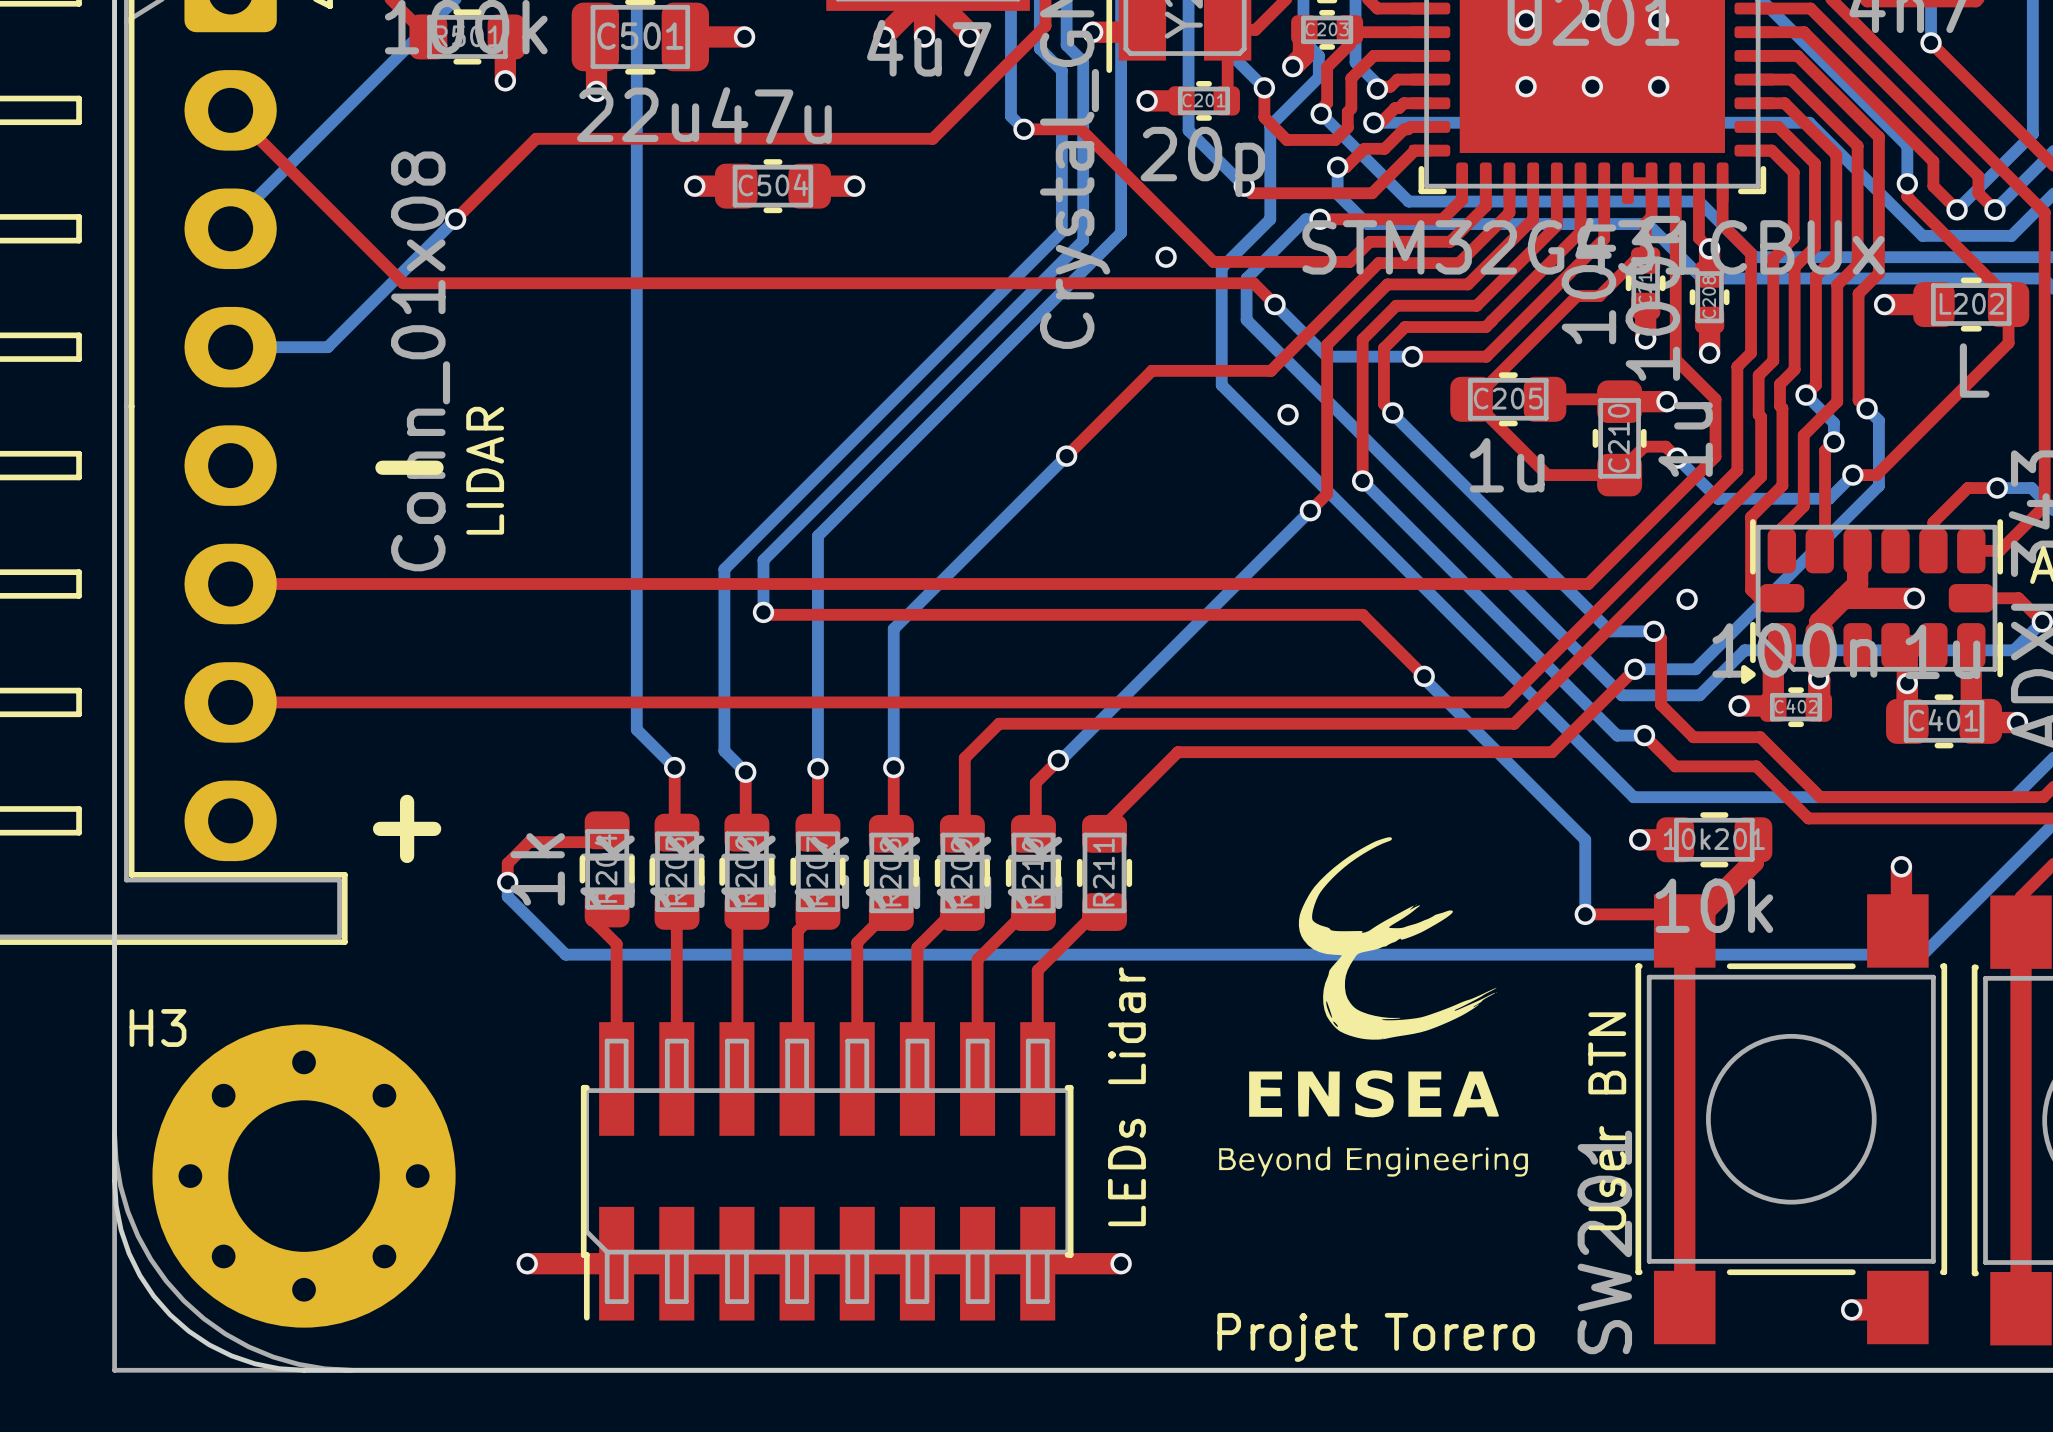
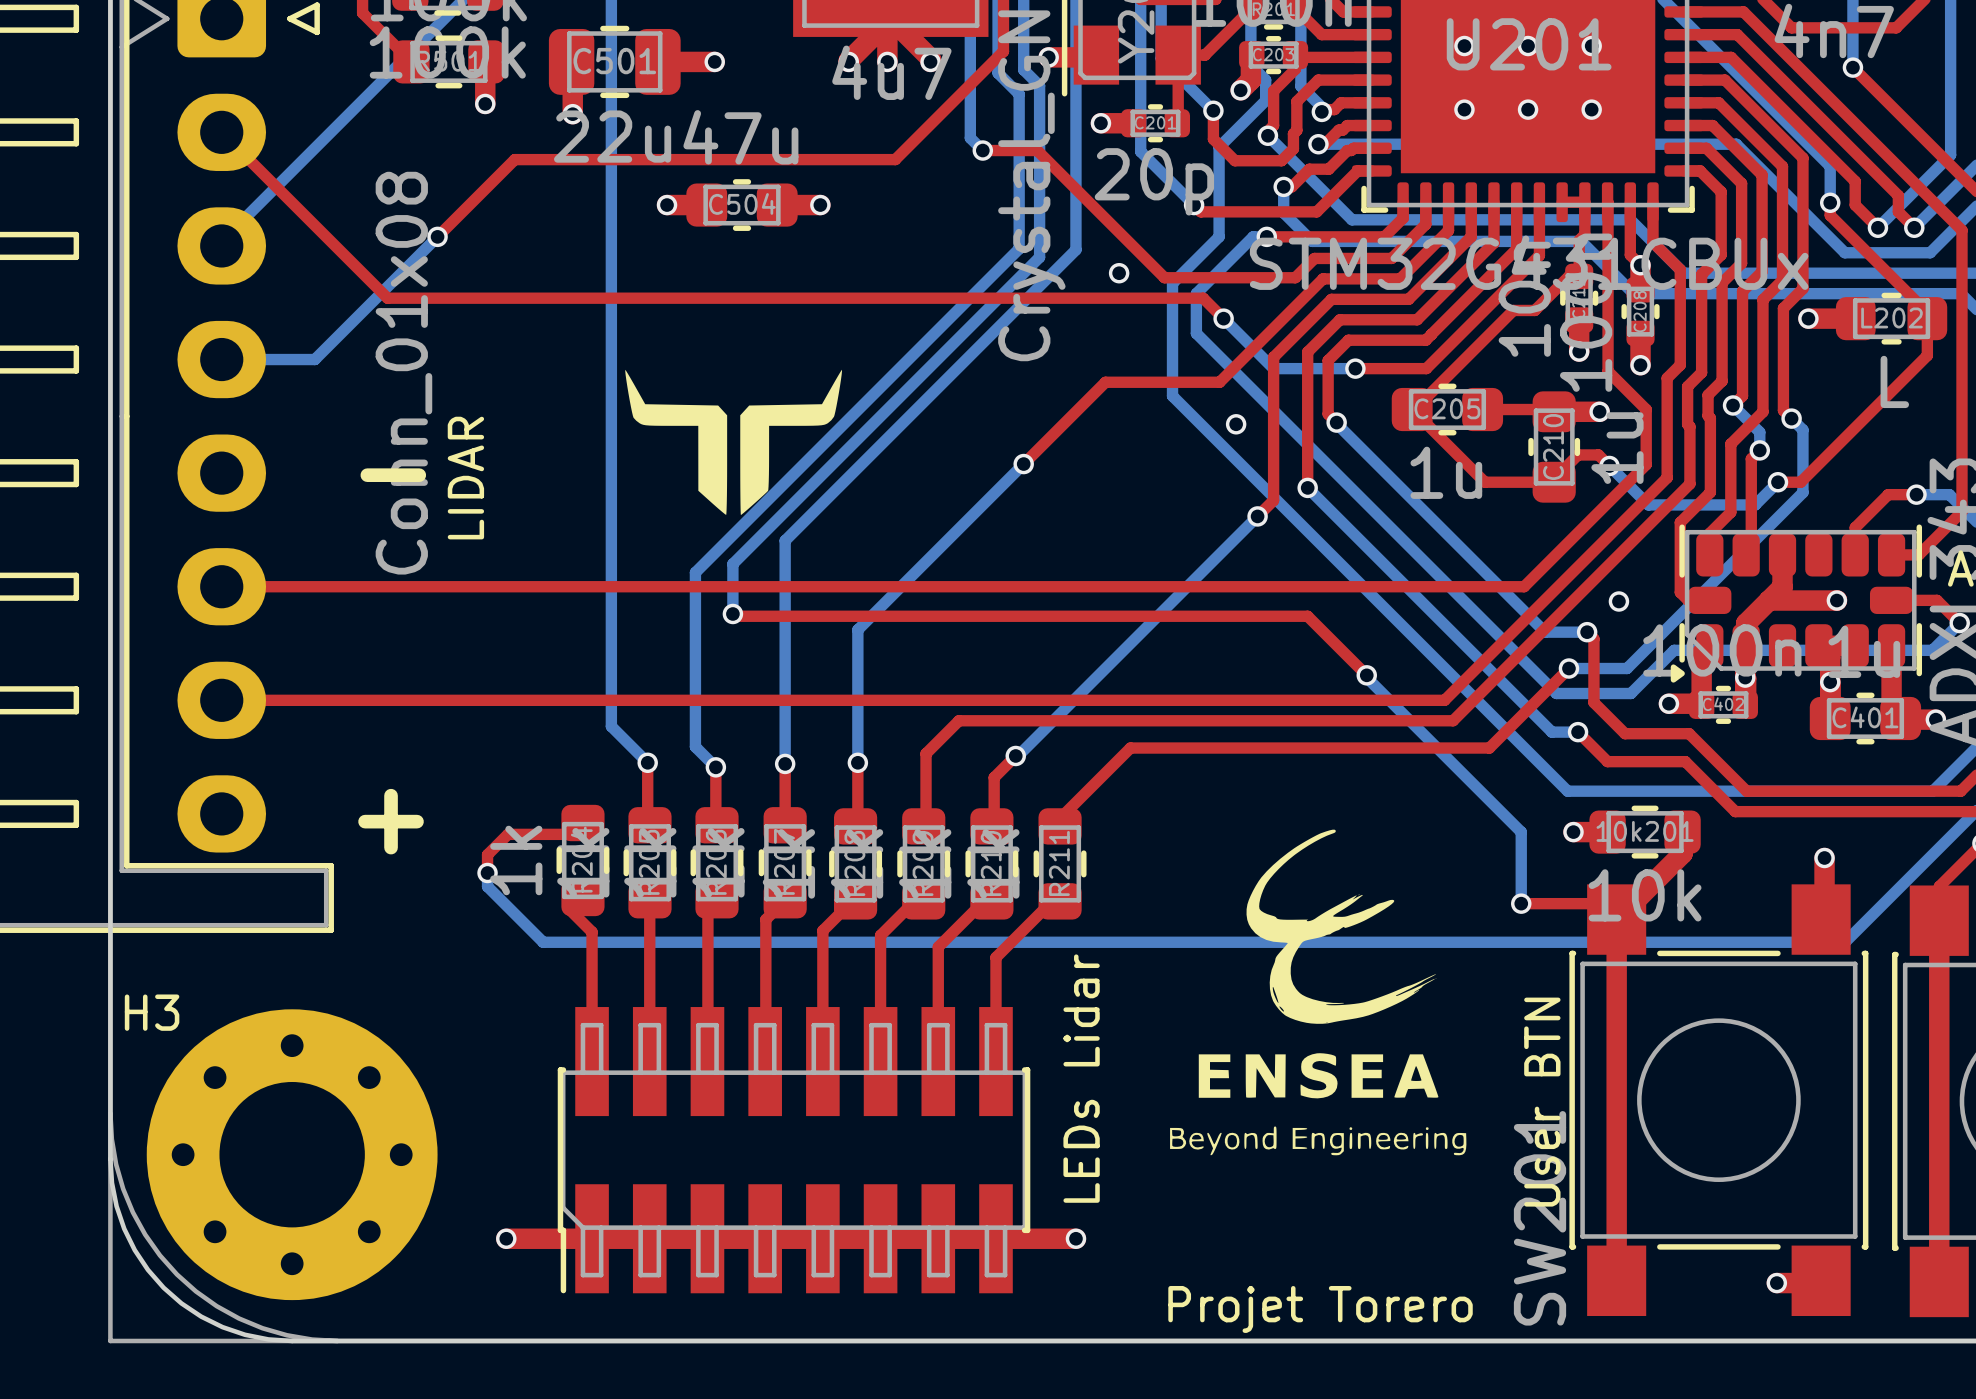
drawing: none -> [625, 369, 842, 516]

